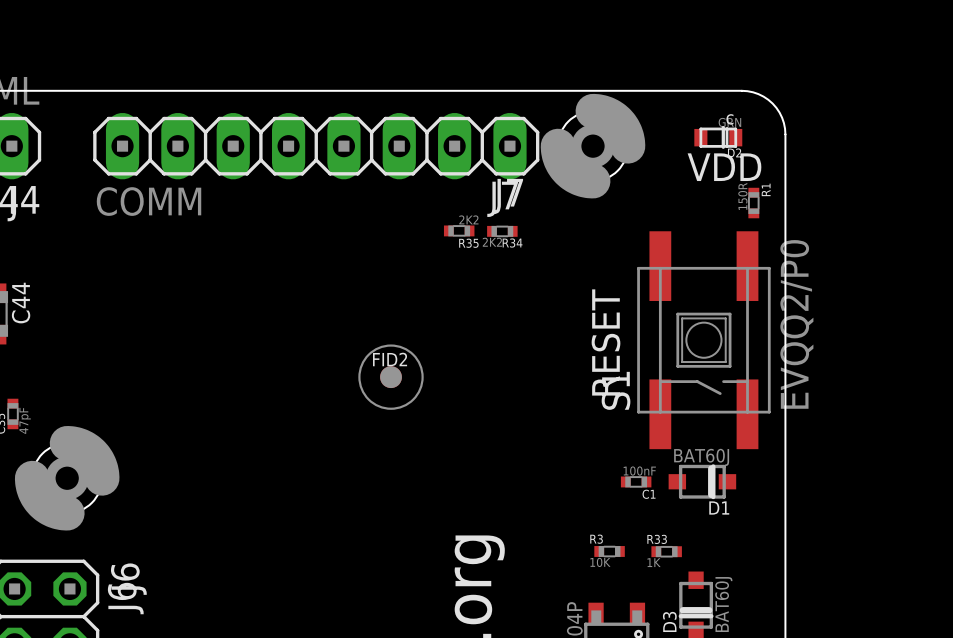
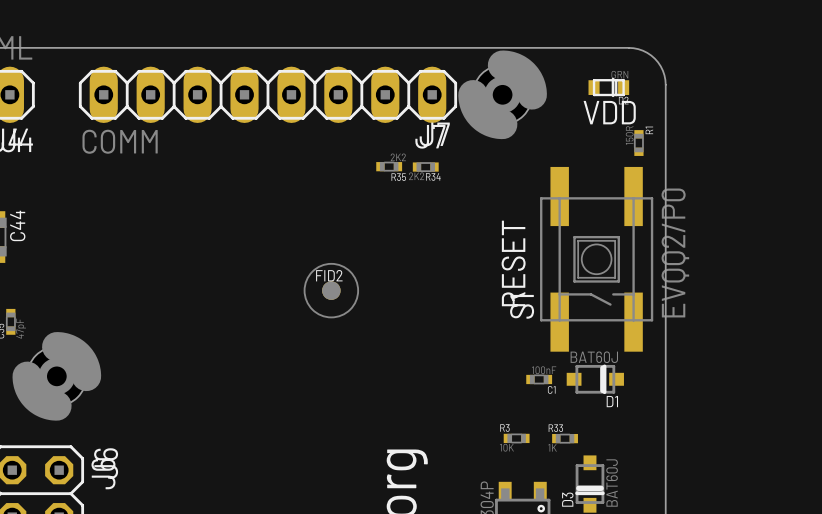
text: c (729, 119) -> none

